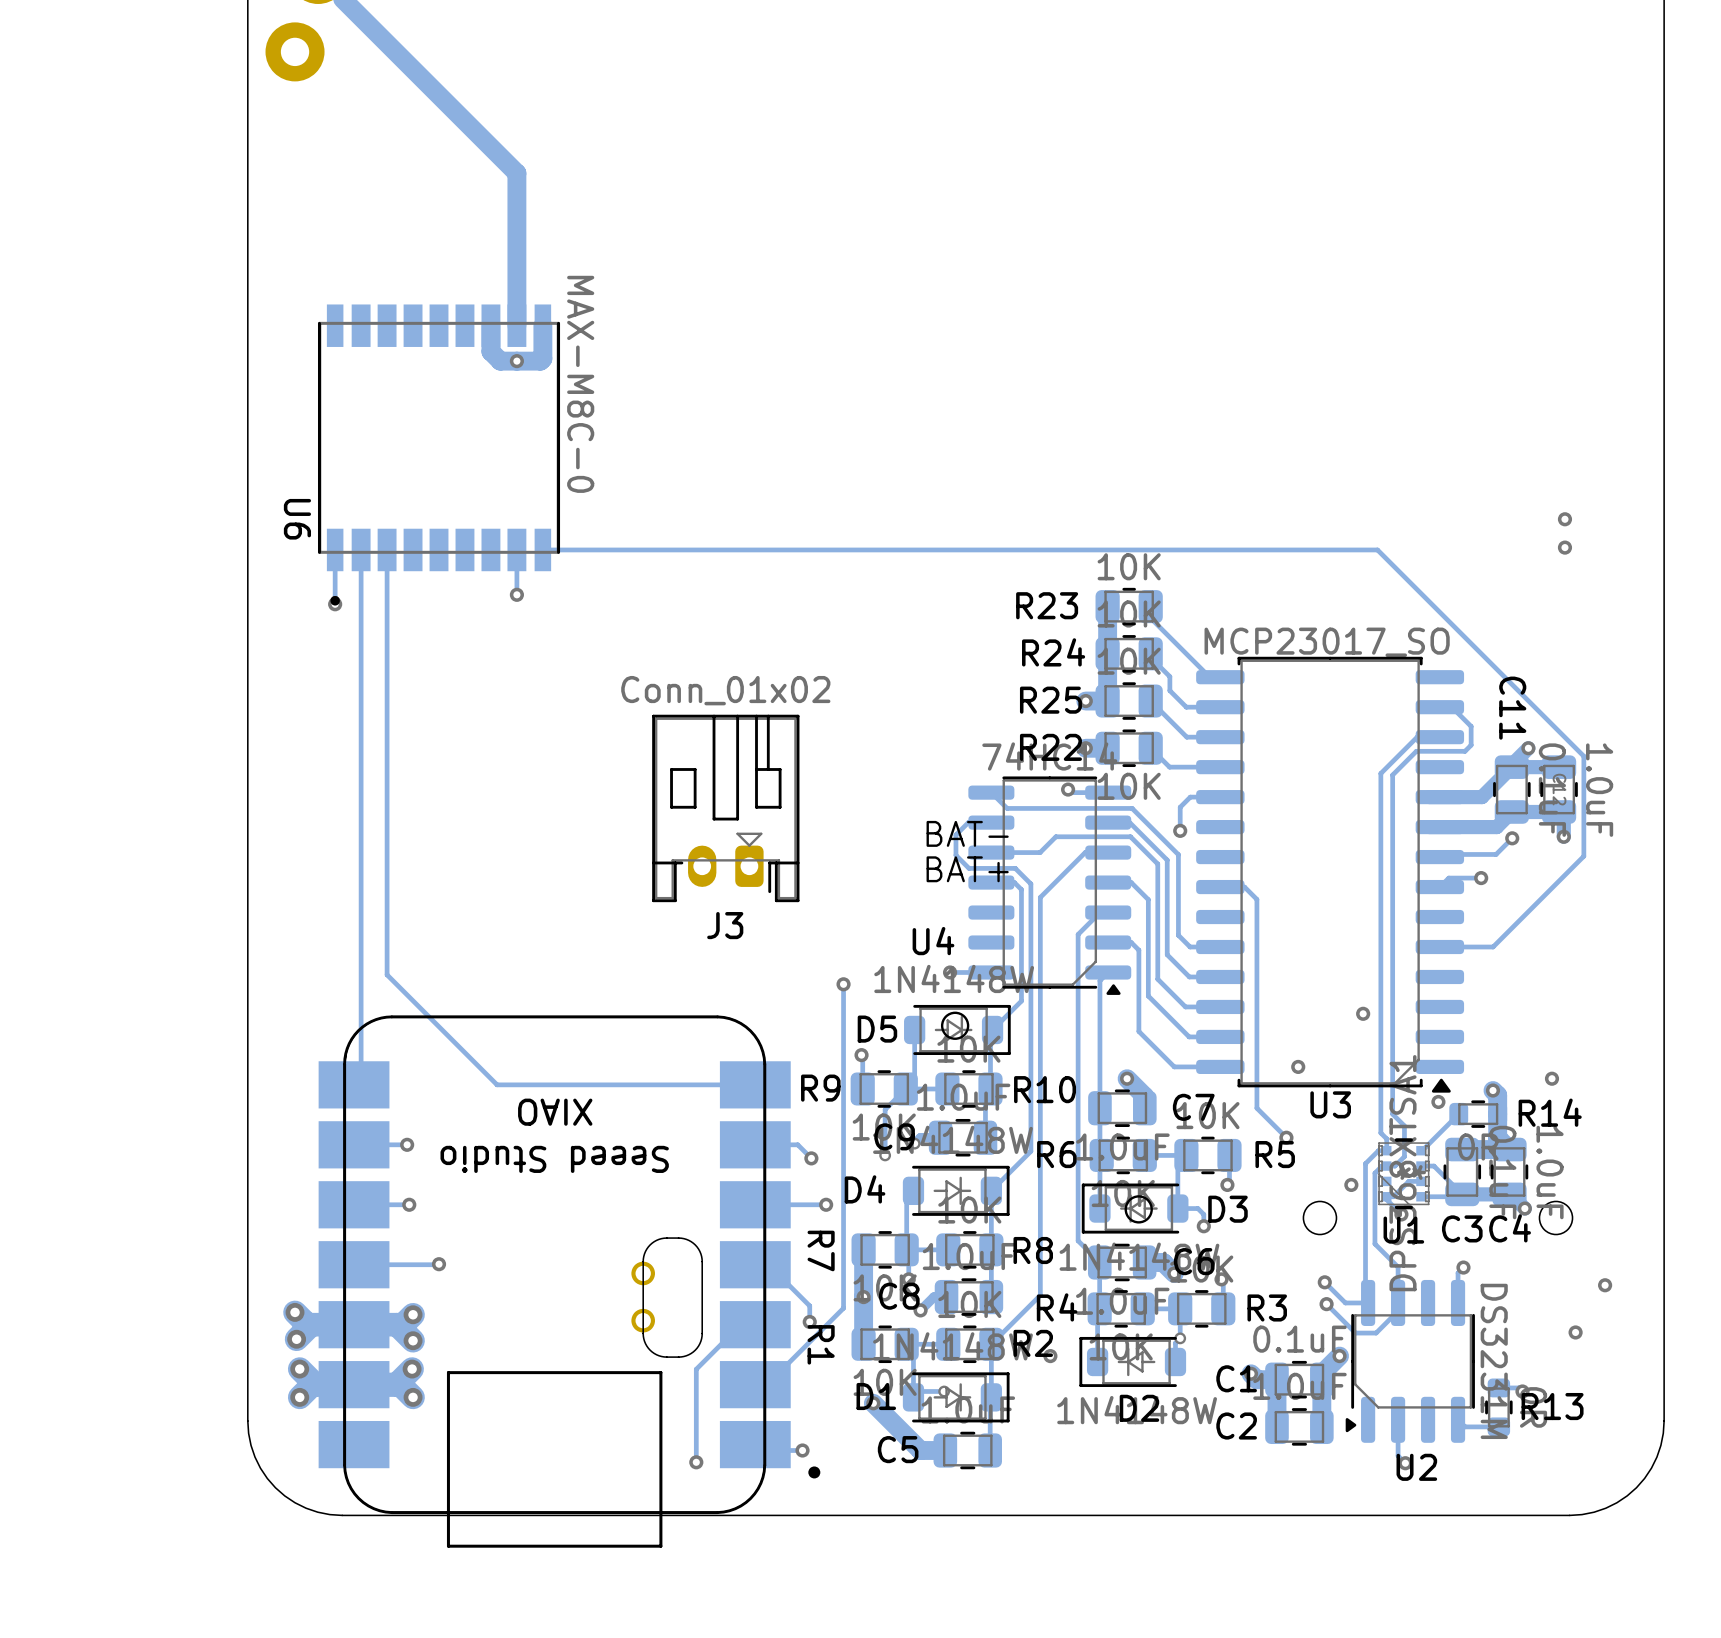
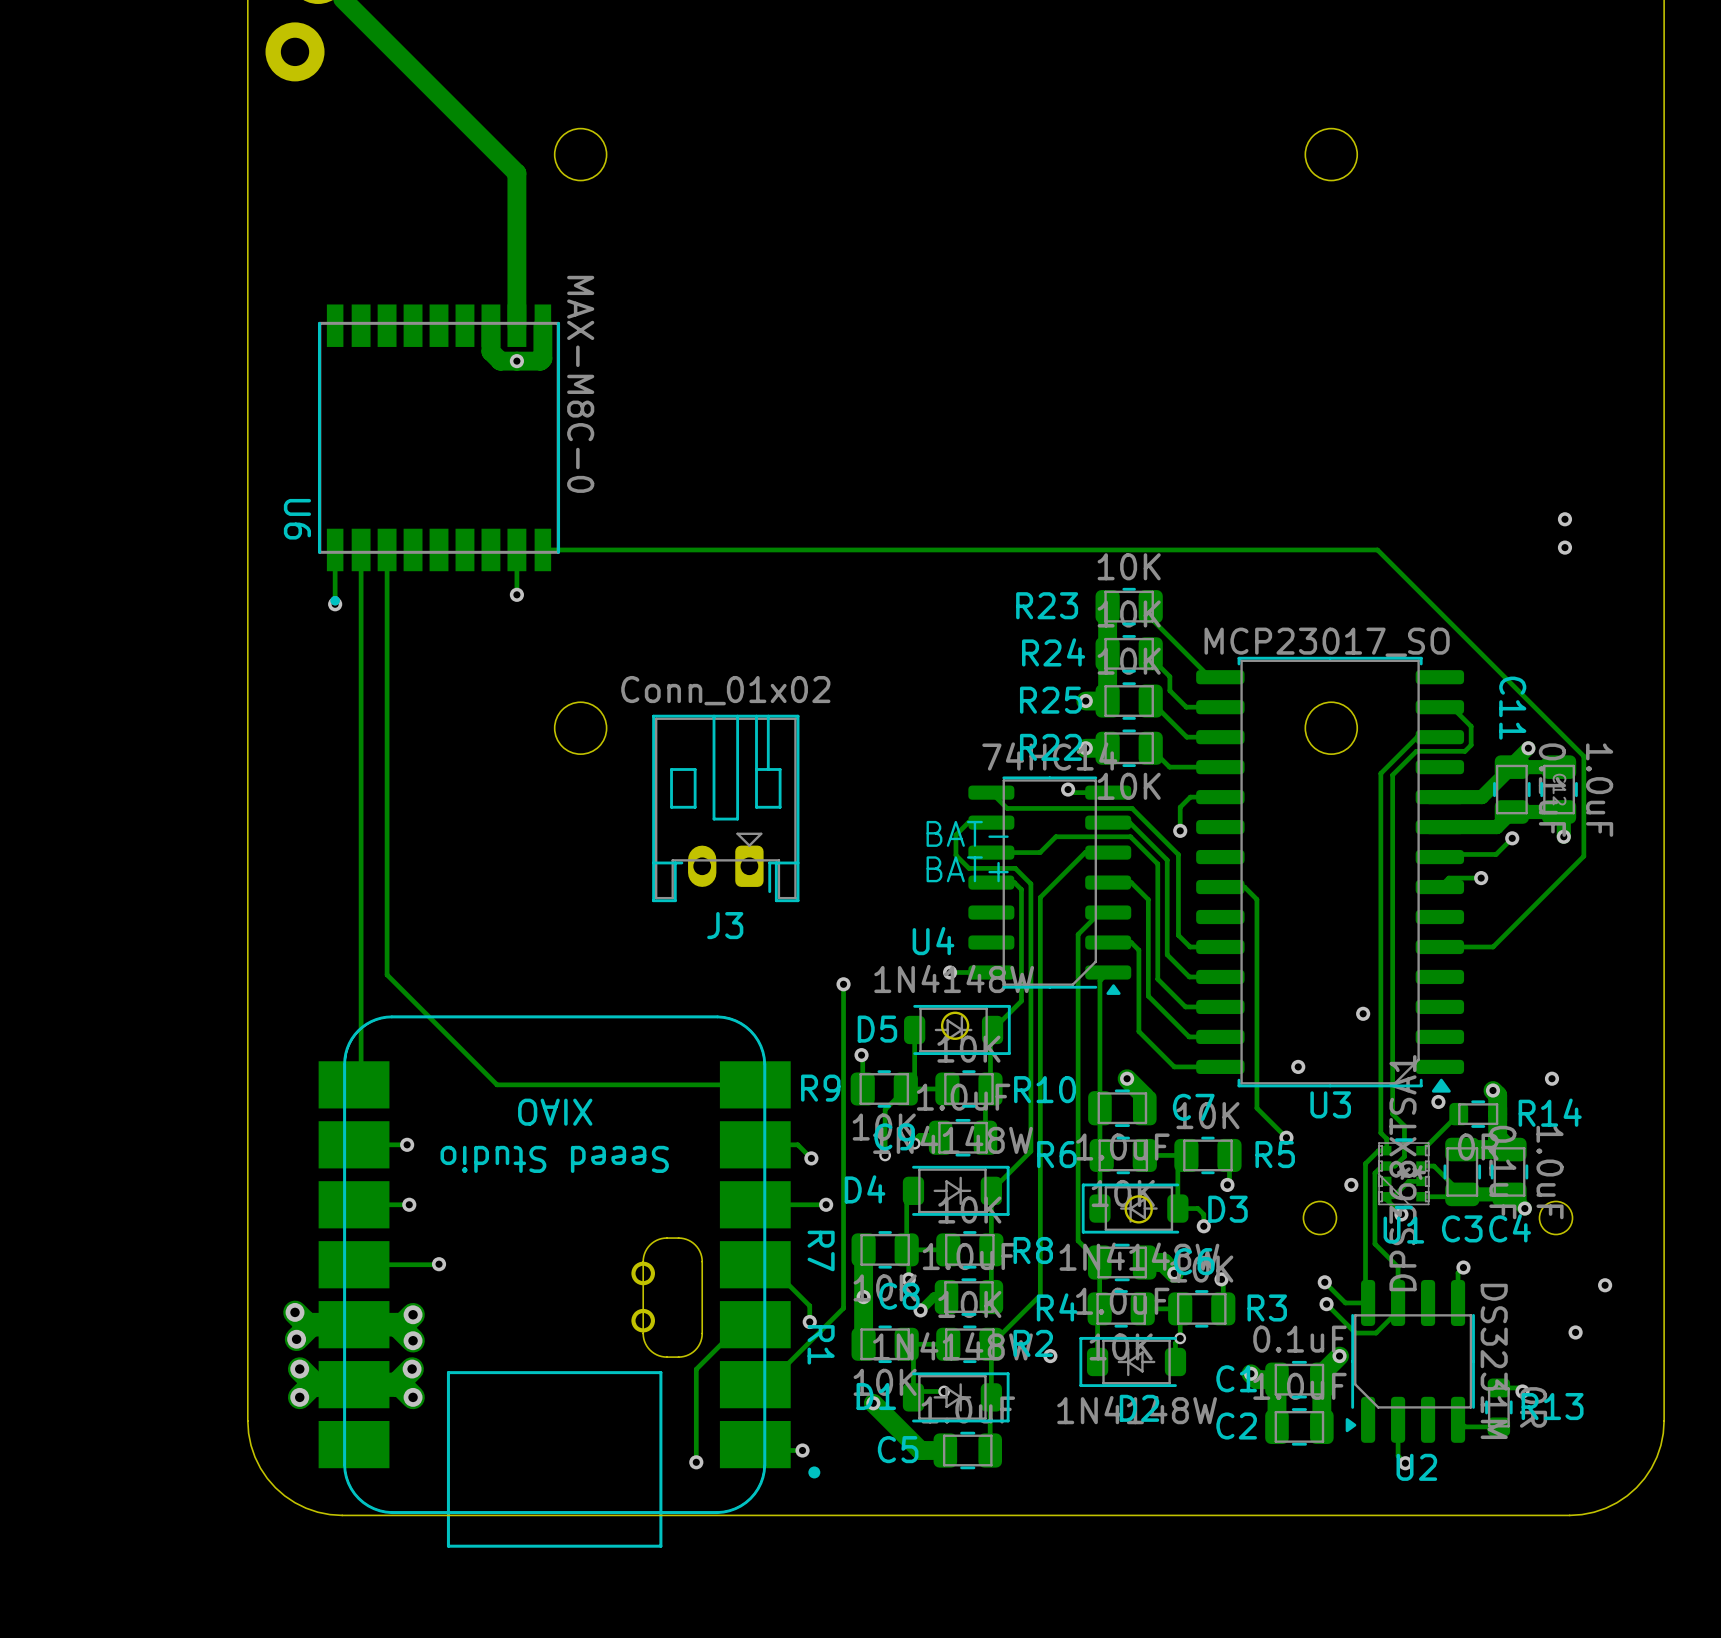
round board edge: none -> [554, 128, 608, 182]
round board edge: none -> [1304, 128, 1358, 182]
round board edge: none -> [554, 701, 608, 755]
round board edge: none -> [1304, 701, 1358, 755]

